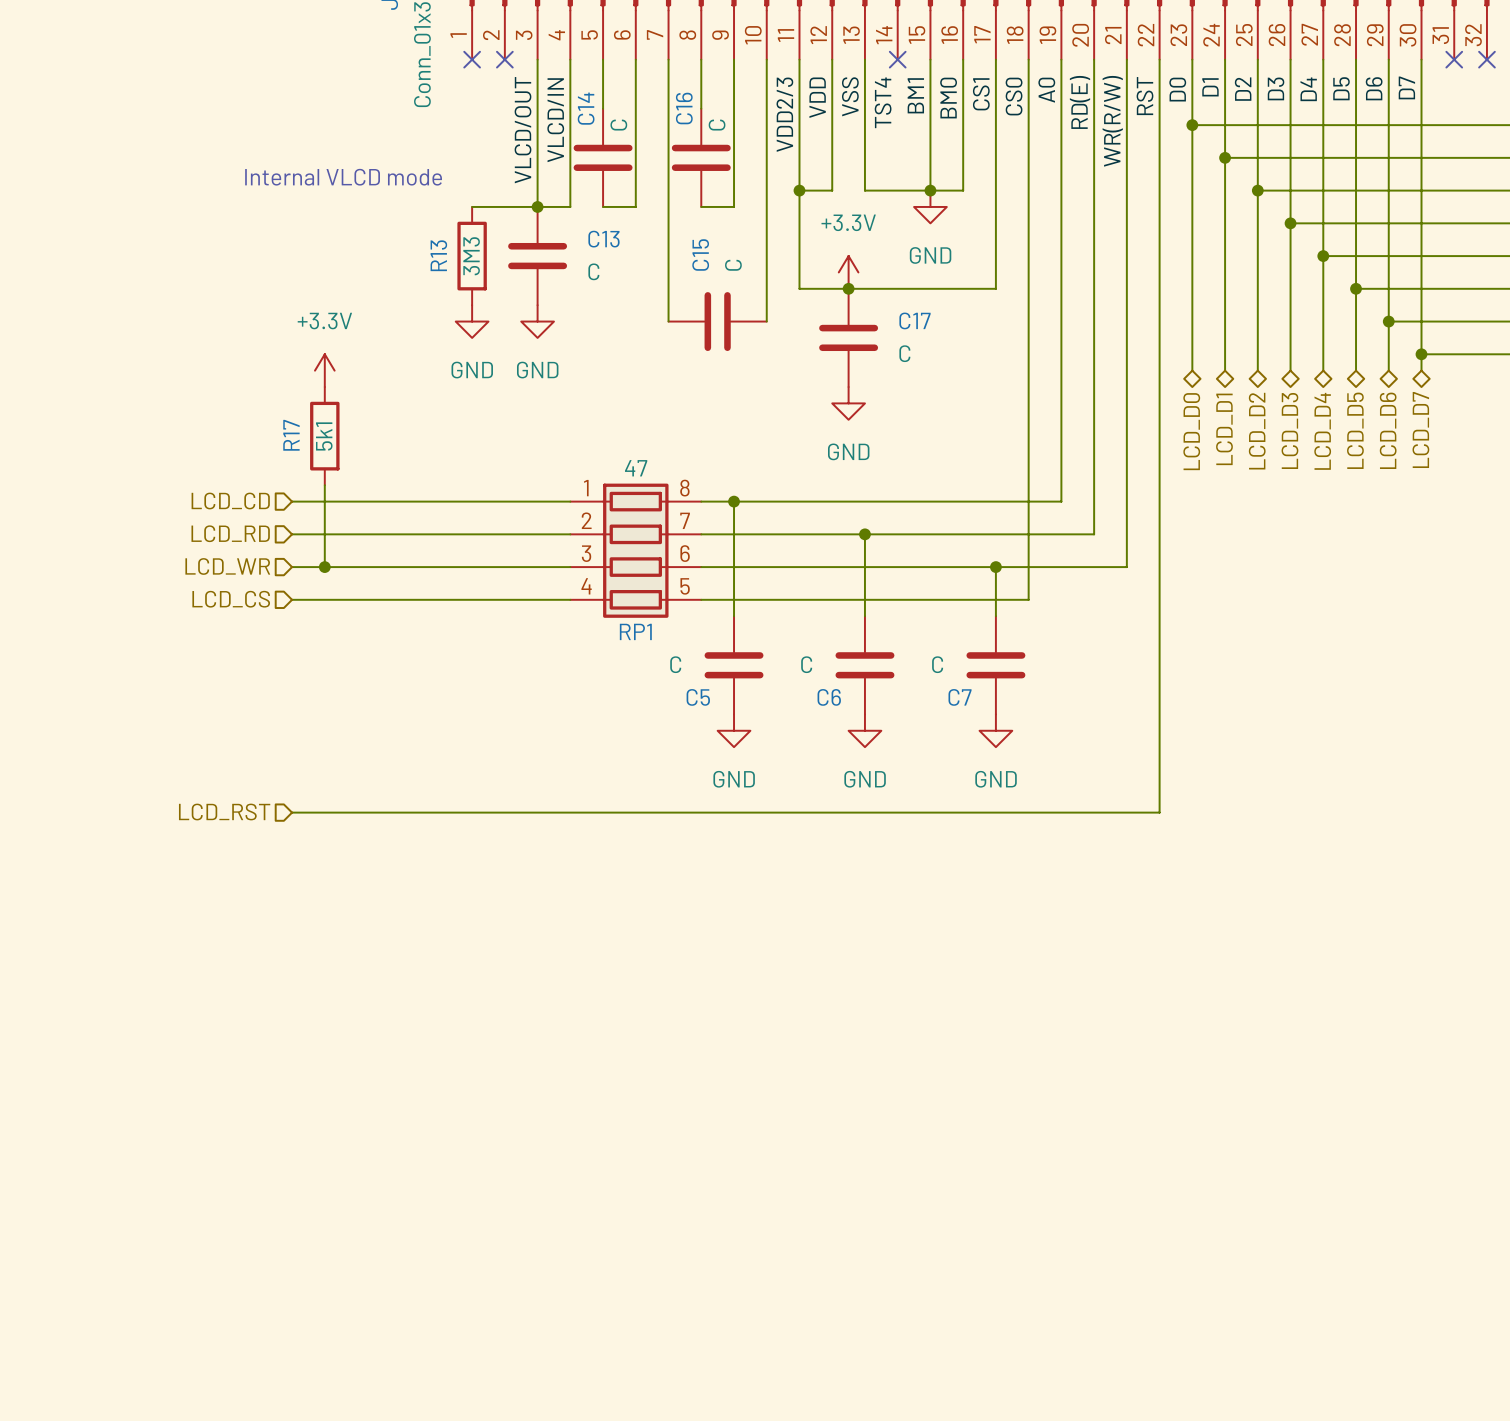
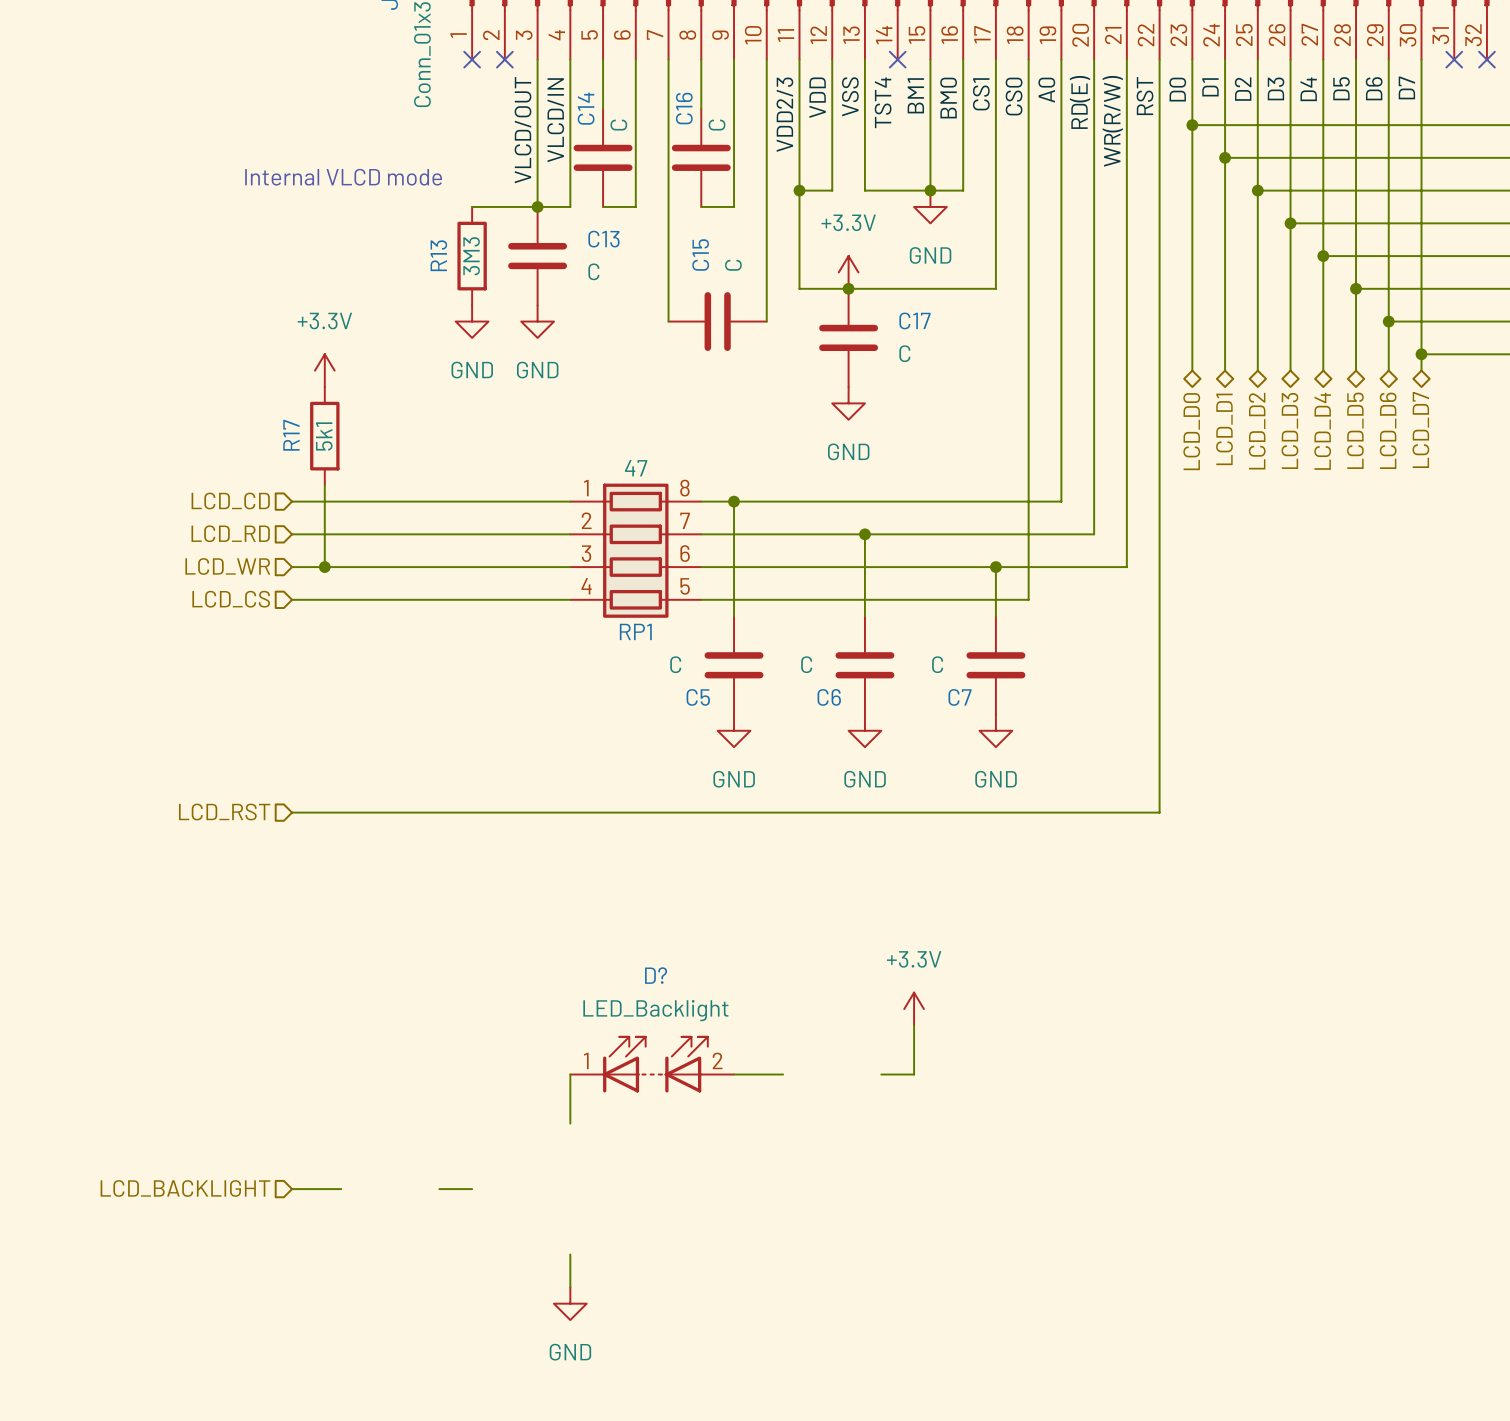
power symbol: none -> +3.3V (914, 1009)
wire: none -> (914, 1025) (914, 1074) (881, 1074)
D?: none -> LED_Backlight (652, 1064)
wire: none -> (570, 1074) (570, 1123)
wire: none -> (734, 1074) (783, 1074)
hierarchical label: none -> LCD_BACKLIGHT (185, 1188)
wire: none -> (292, 1189) (341, 1189)
wire: none -> (439, 1189) (472, 1189)
wire: none -> (570, 1254) (570, 1287)
power symbol: none -> GND (570, 1303)

